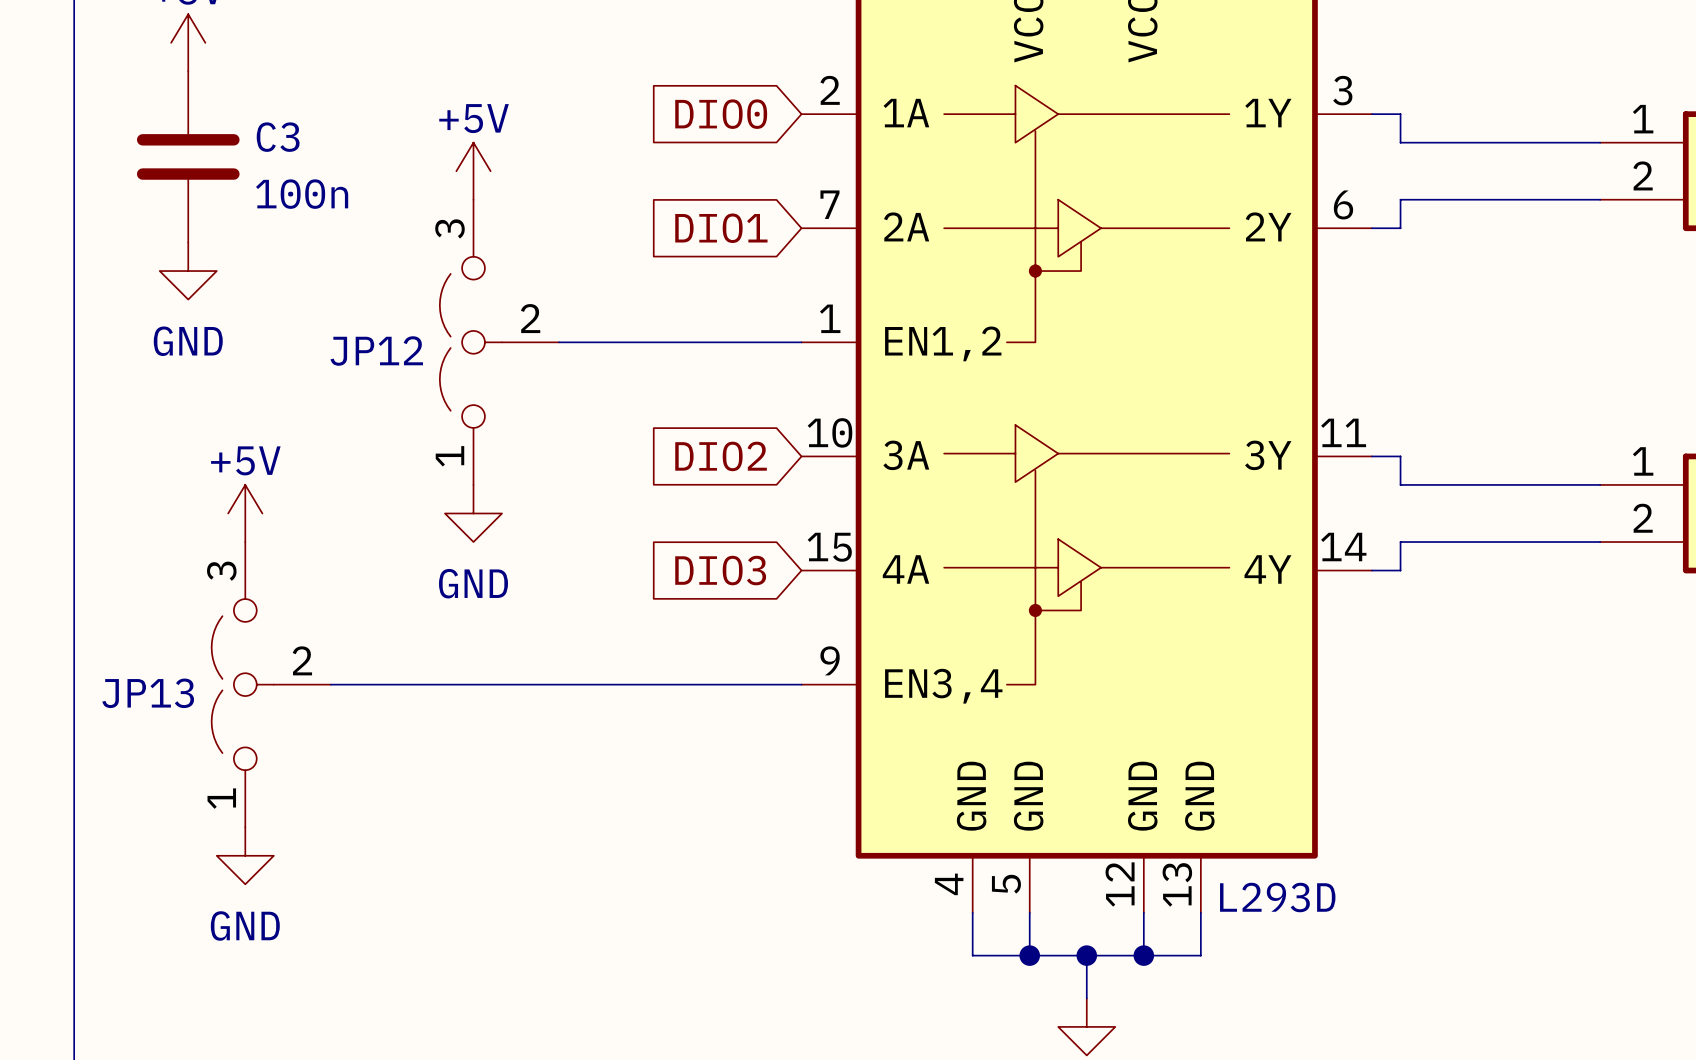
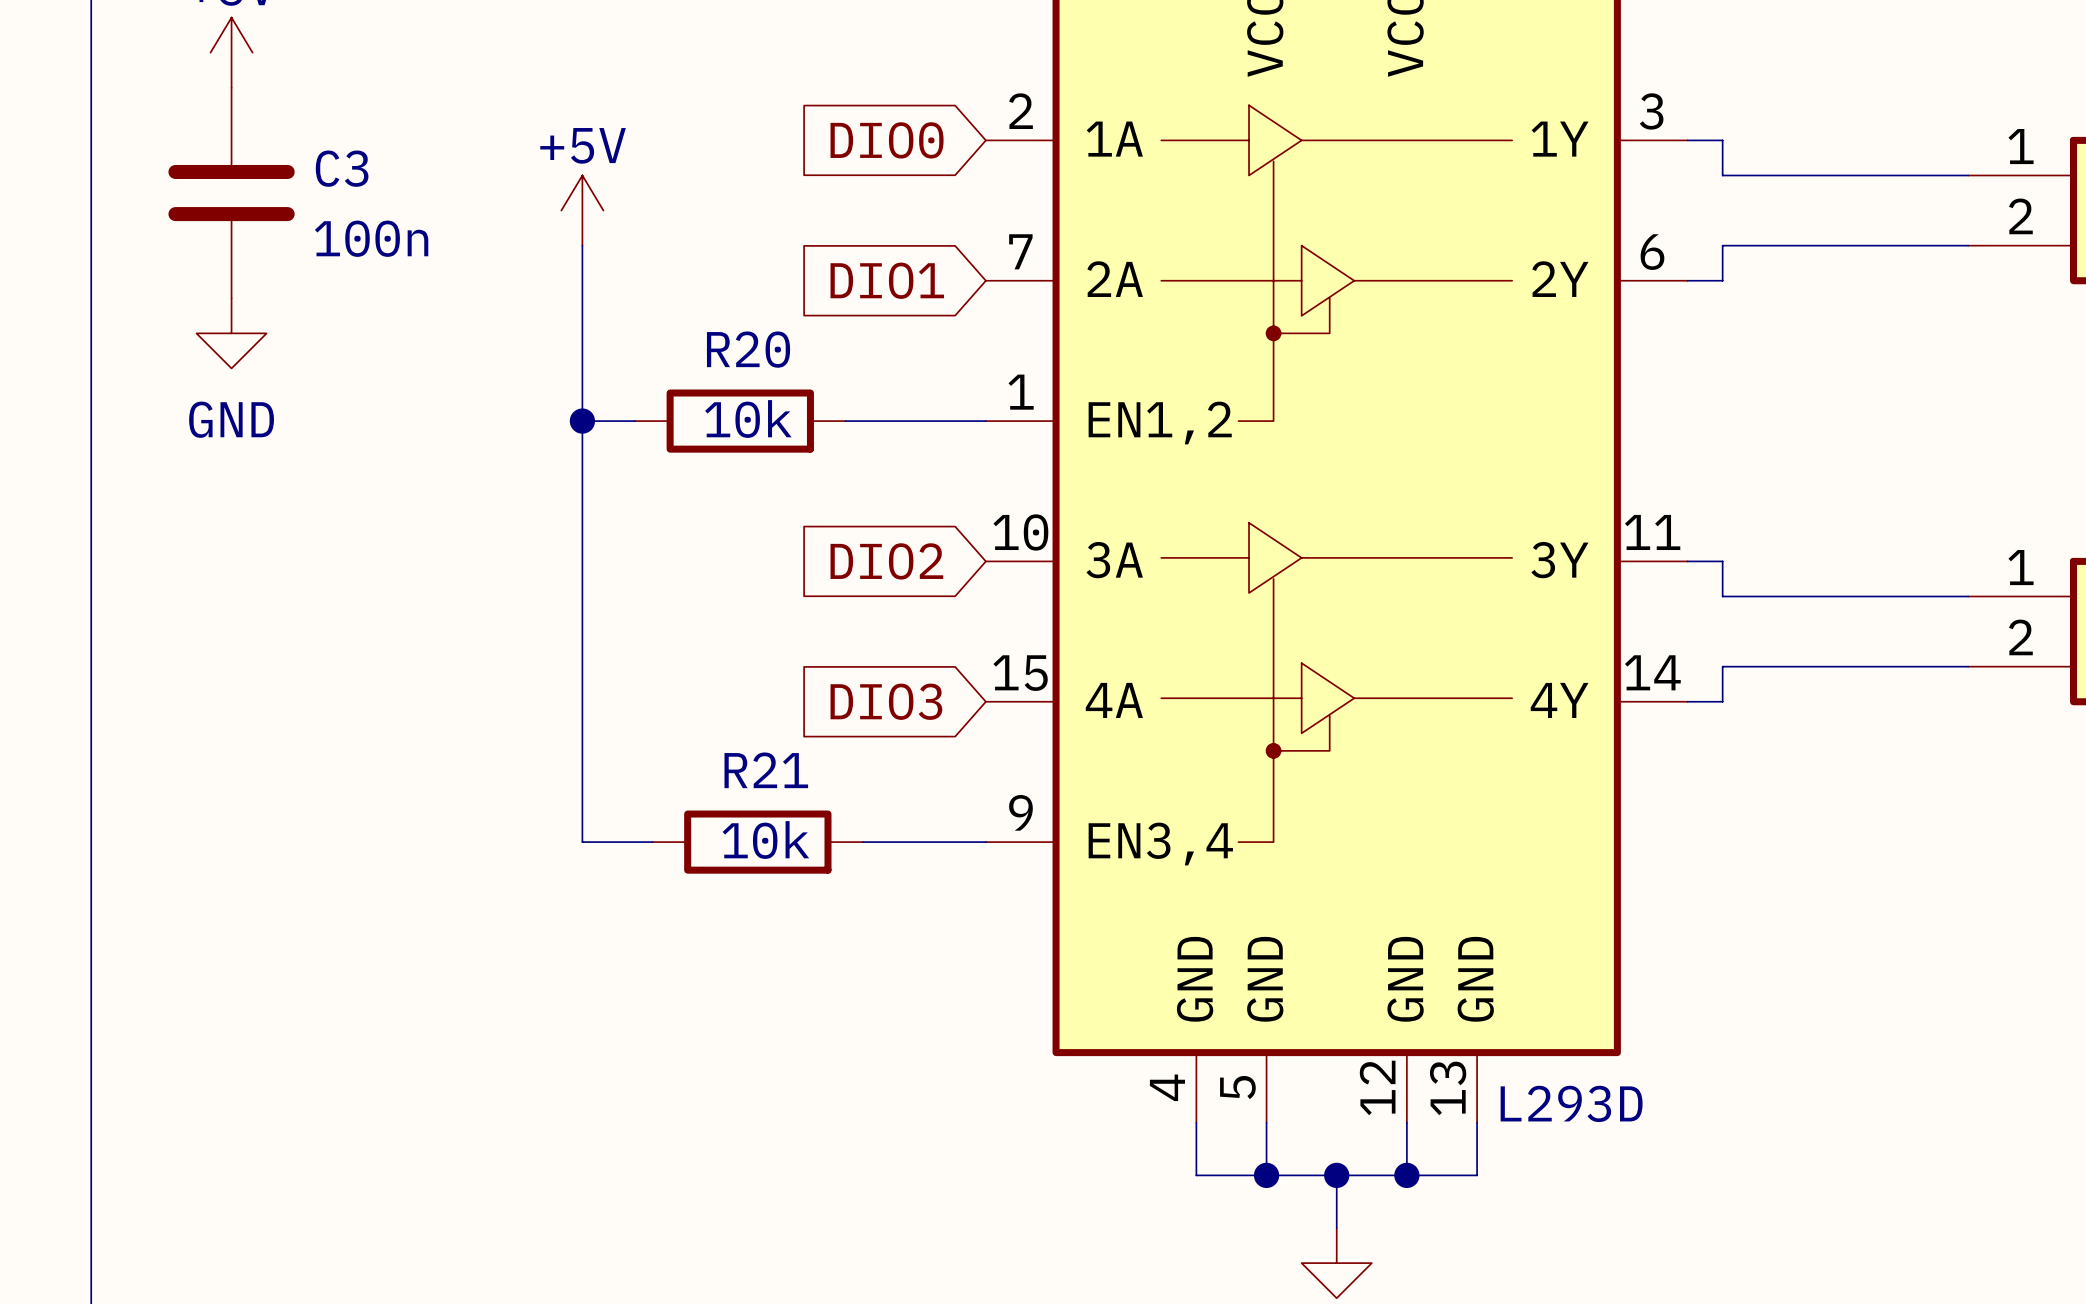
junction: none -> (582, 421)
JP12: (499, 342) -> none
wire: (559, 342) (687, 342) -> none
R20: none -> 10k (740, 421)
power symbol: +5V (245, 513) -> none
power symbol: GND (473, 513) -> none
JP13: (271, 684) -> none
wire: (330, 684) (473, 684) -> (582, 245) (582, 842)
wire: (530, 684) (701, 684) -> none
R21: none -> 10k (757, 842)
power symbol: GND (245, 855) -> none

